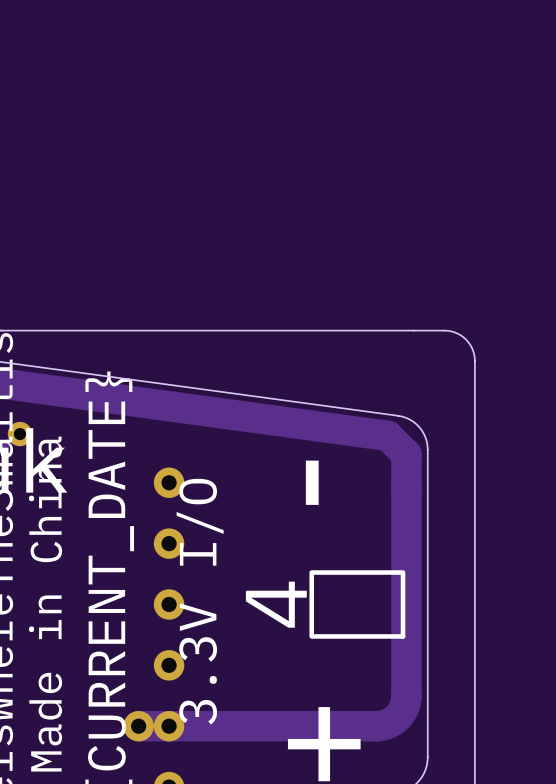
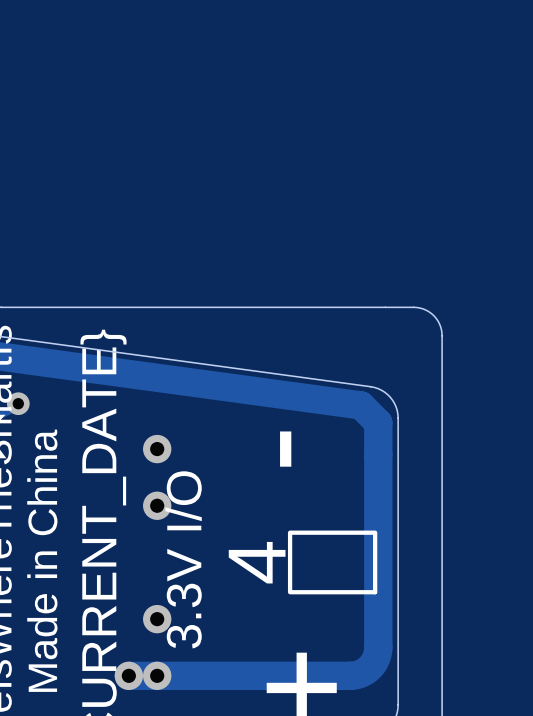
via: (169, 604) -> none

